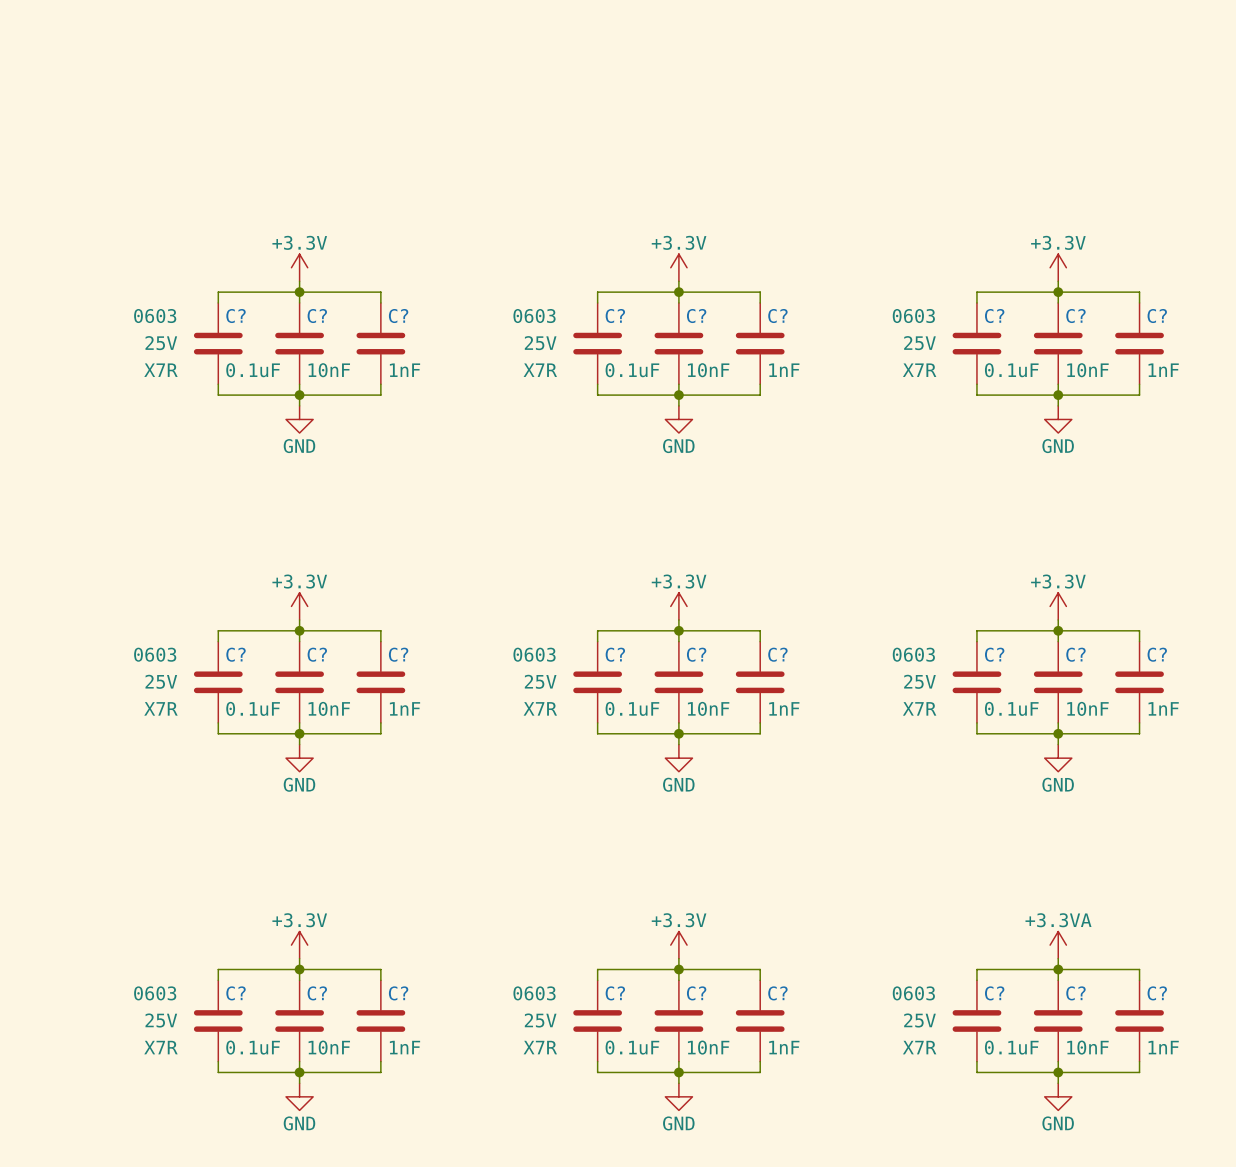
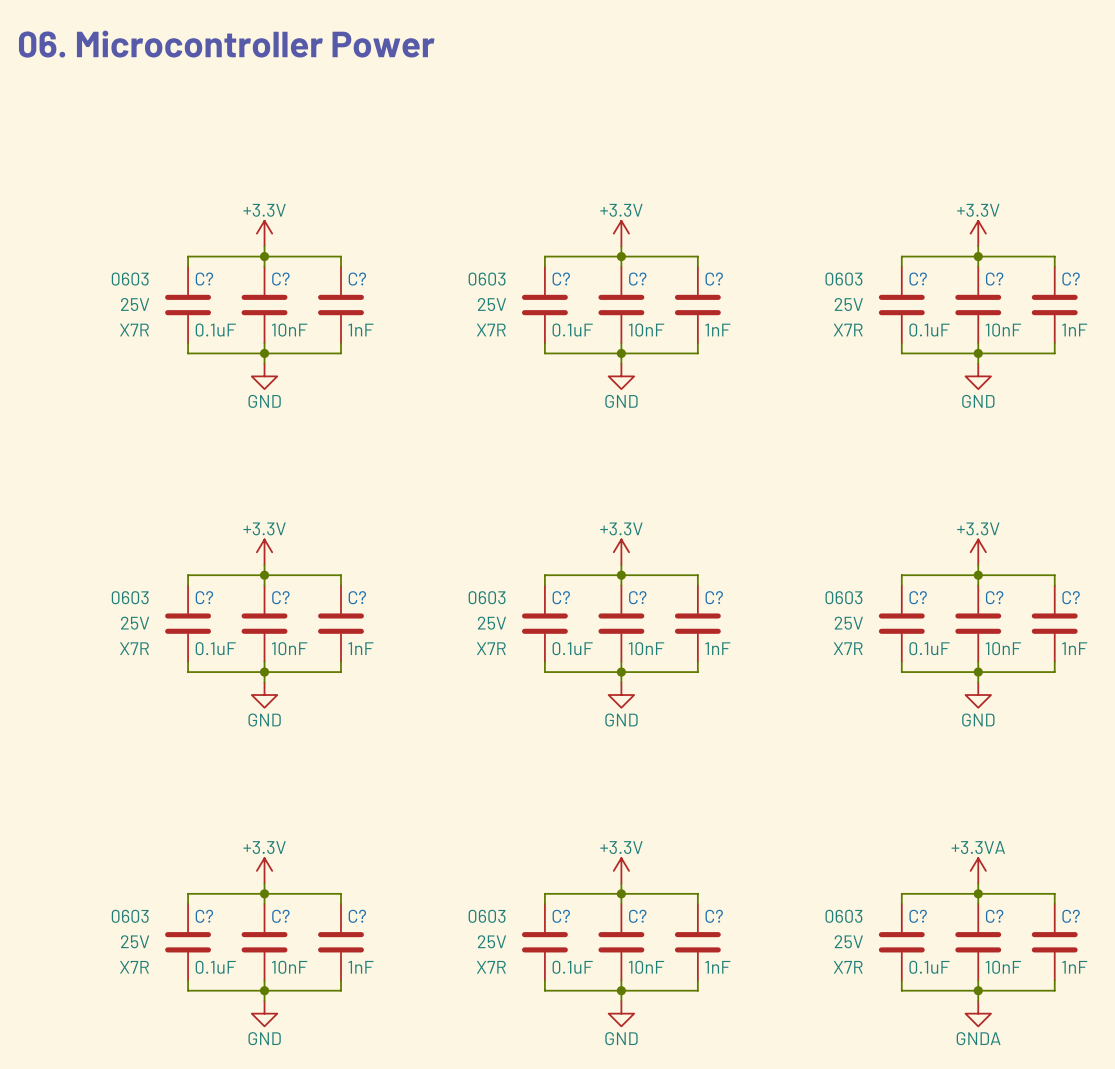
text: none -> 06. Microcontroller Power (226, 44)
power symbol: GND (1058, 1096) -> GNDA (978, 1013)

